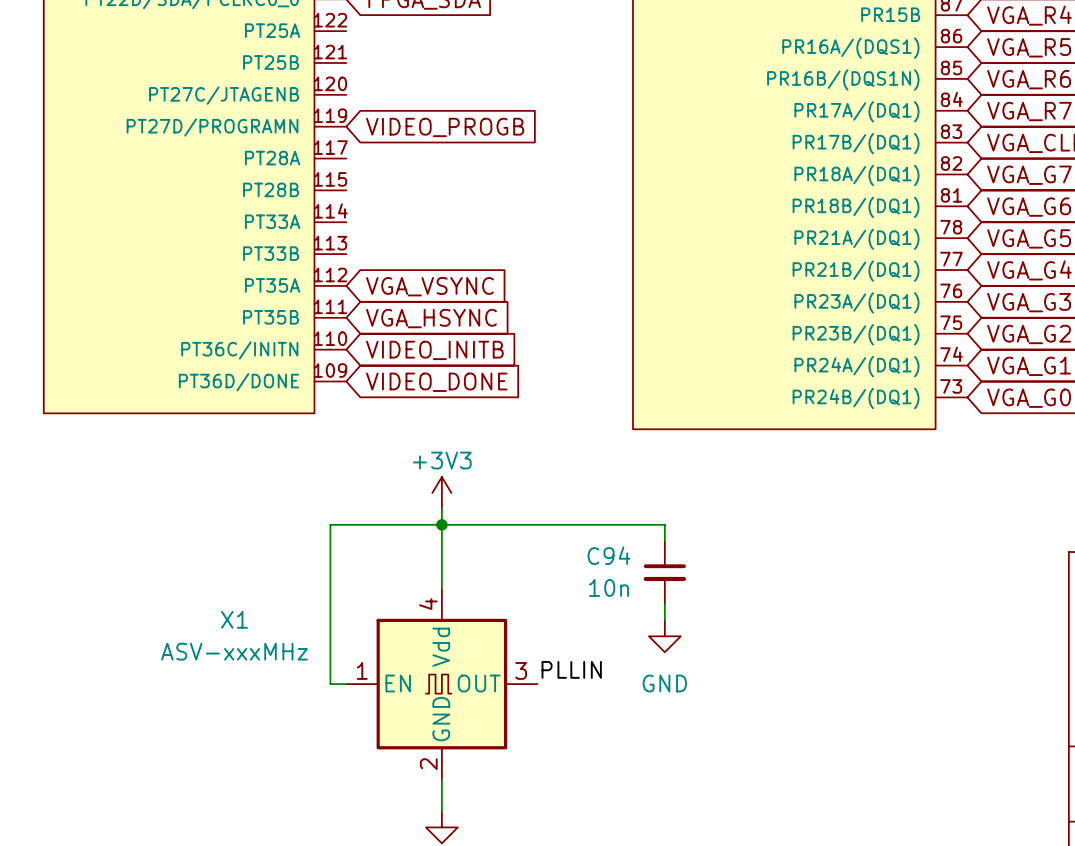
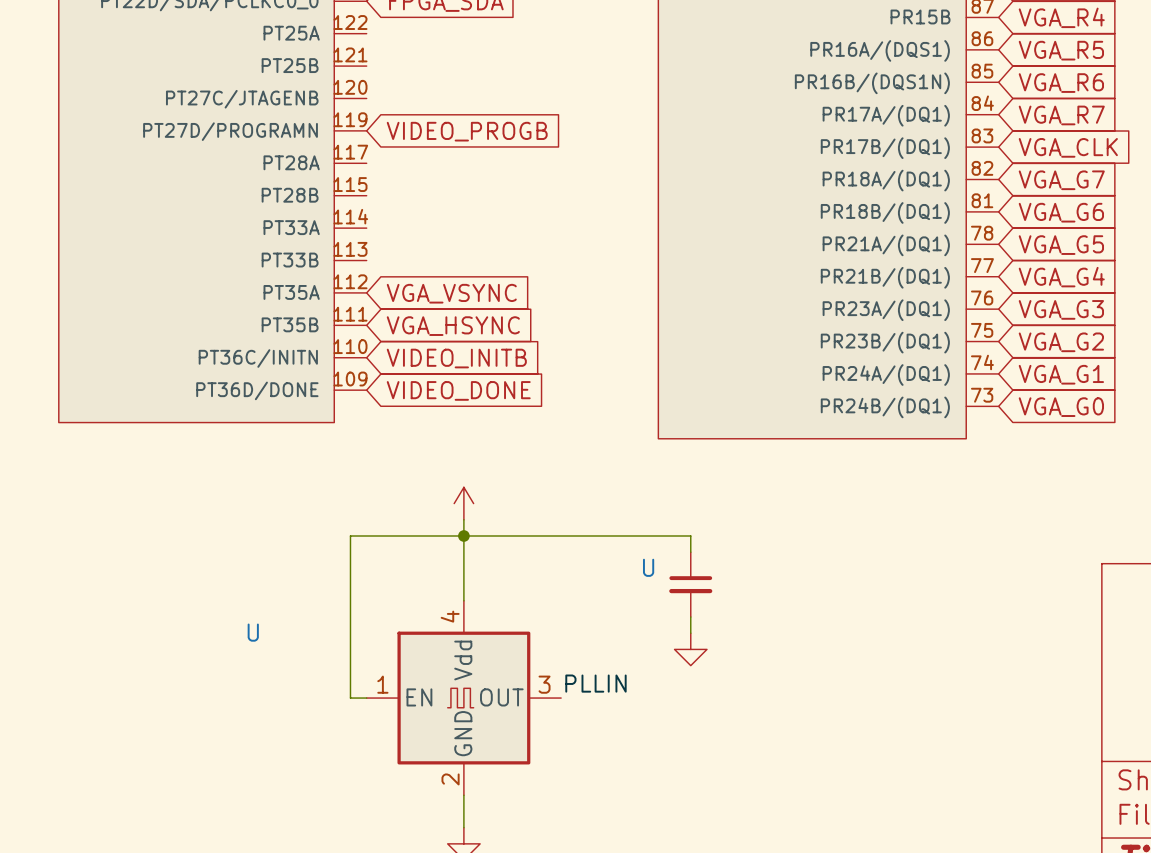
power symbol text: +3V3 (442, 460) -> none
C94 name: C94 (608, 555) -> U (648, 567)
C94 value: 10n (608, 587) -> none
X1 name: X1 (234, 619) -> U (253, 632)
X1 value: ASV-xxxMHz (234, 651) -> none
power symbol text: GND (664, 683) -> none

